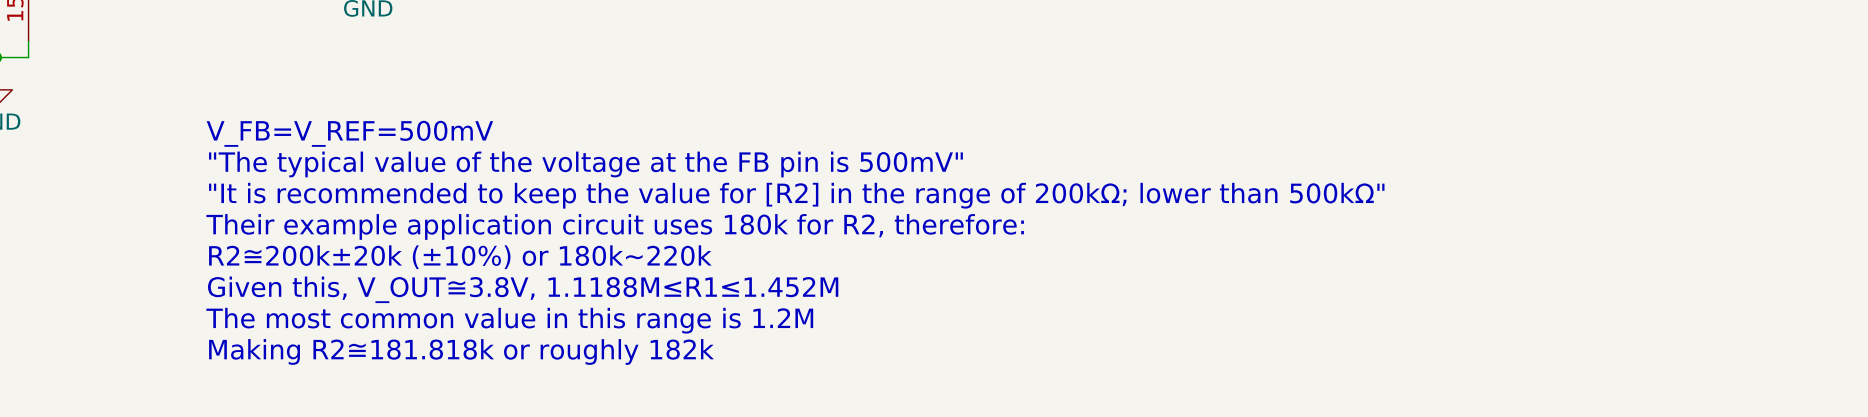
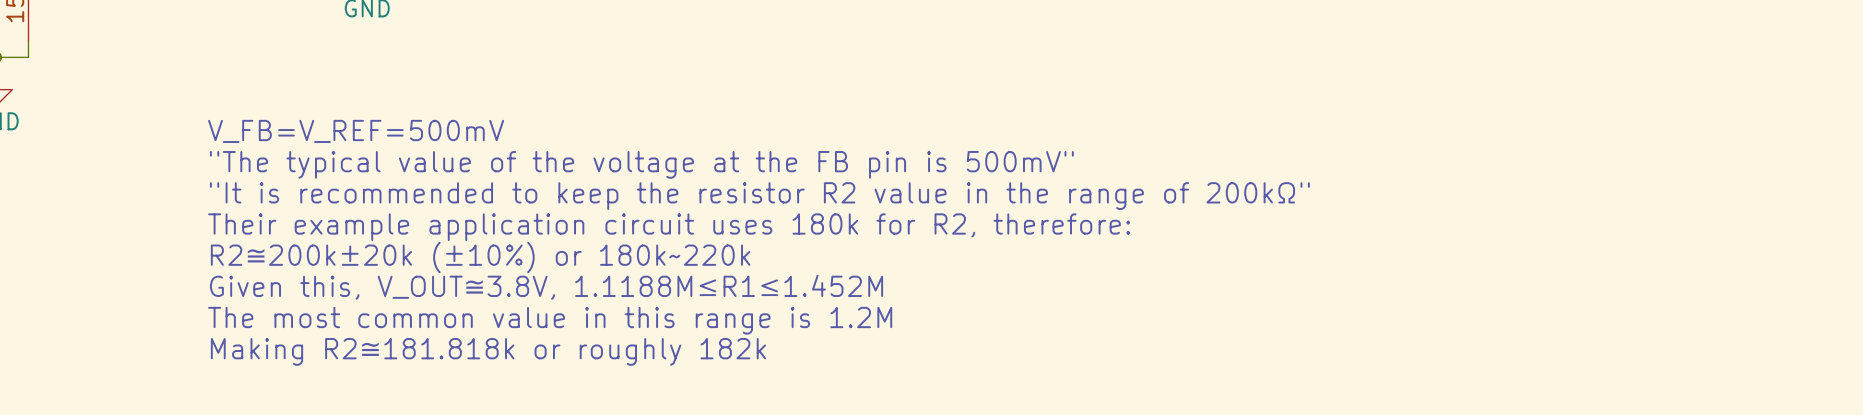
text: "It is recommended to keep the value for [R2] in the range of 200kΩ; lower than 500kΩ" (796, 195) -> "It is recommended to keep the resistor R2 value in the range of 200kΩ" (759, 196)

